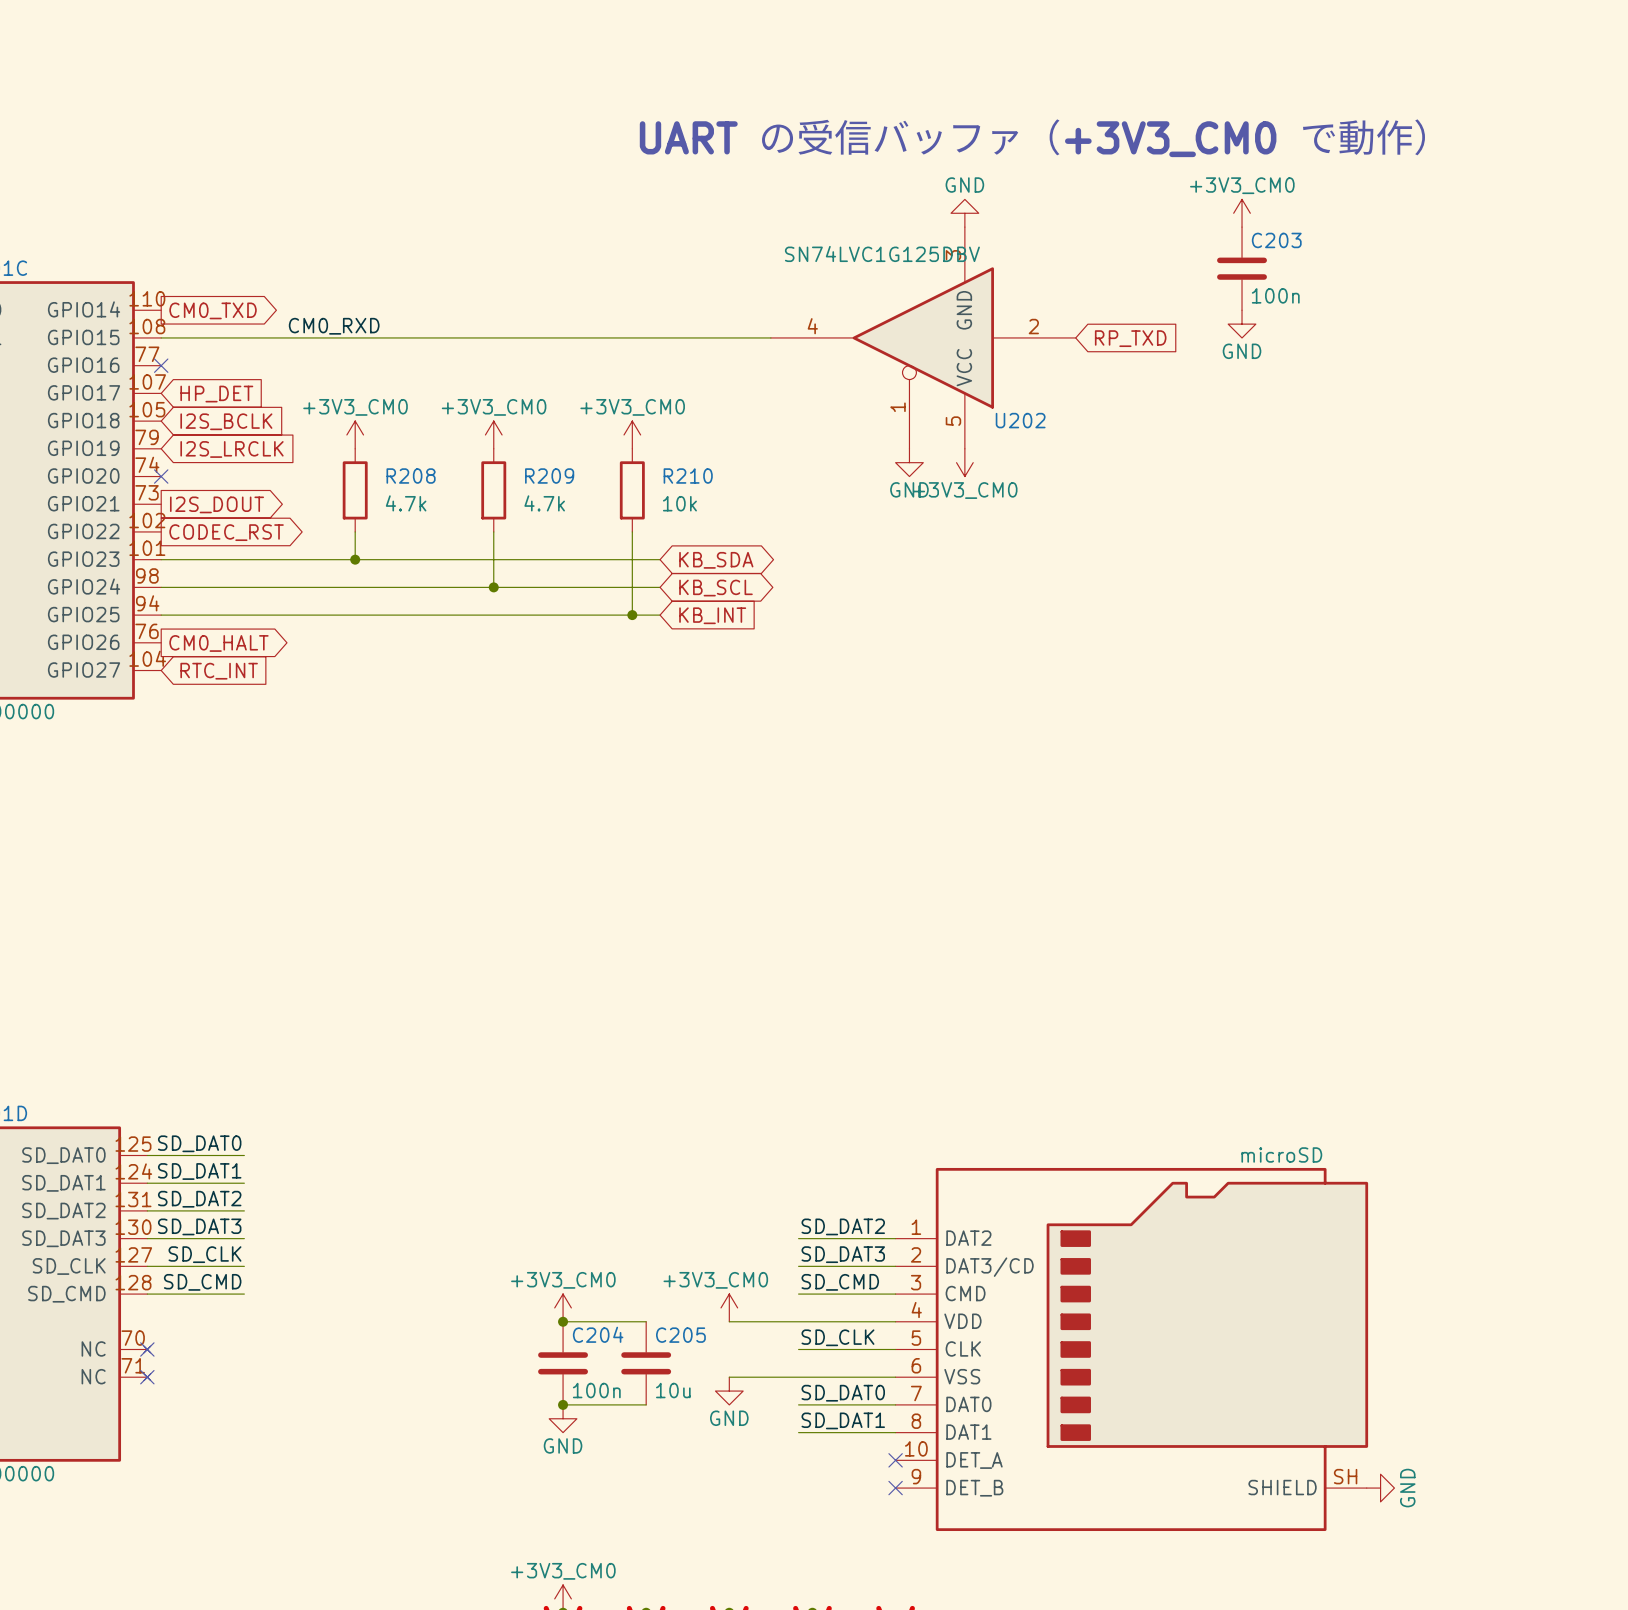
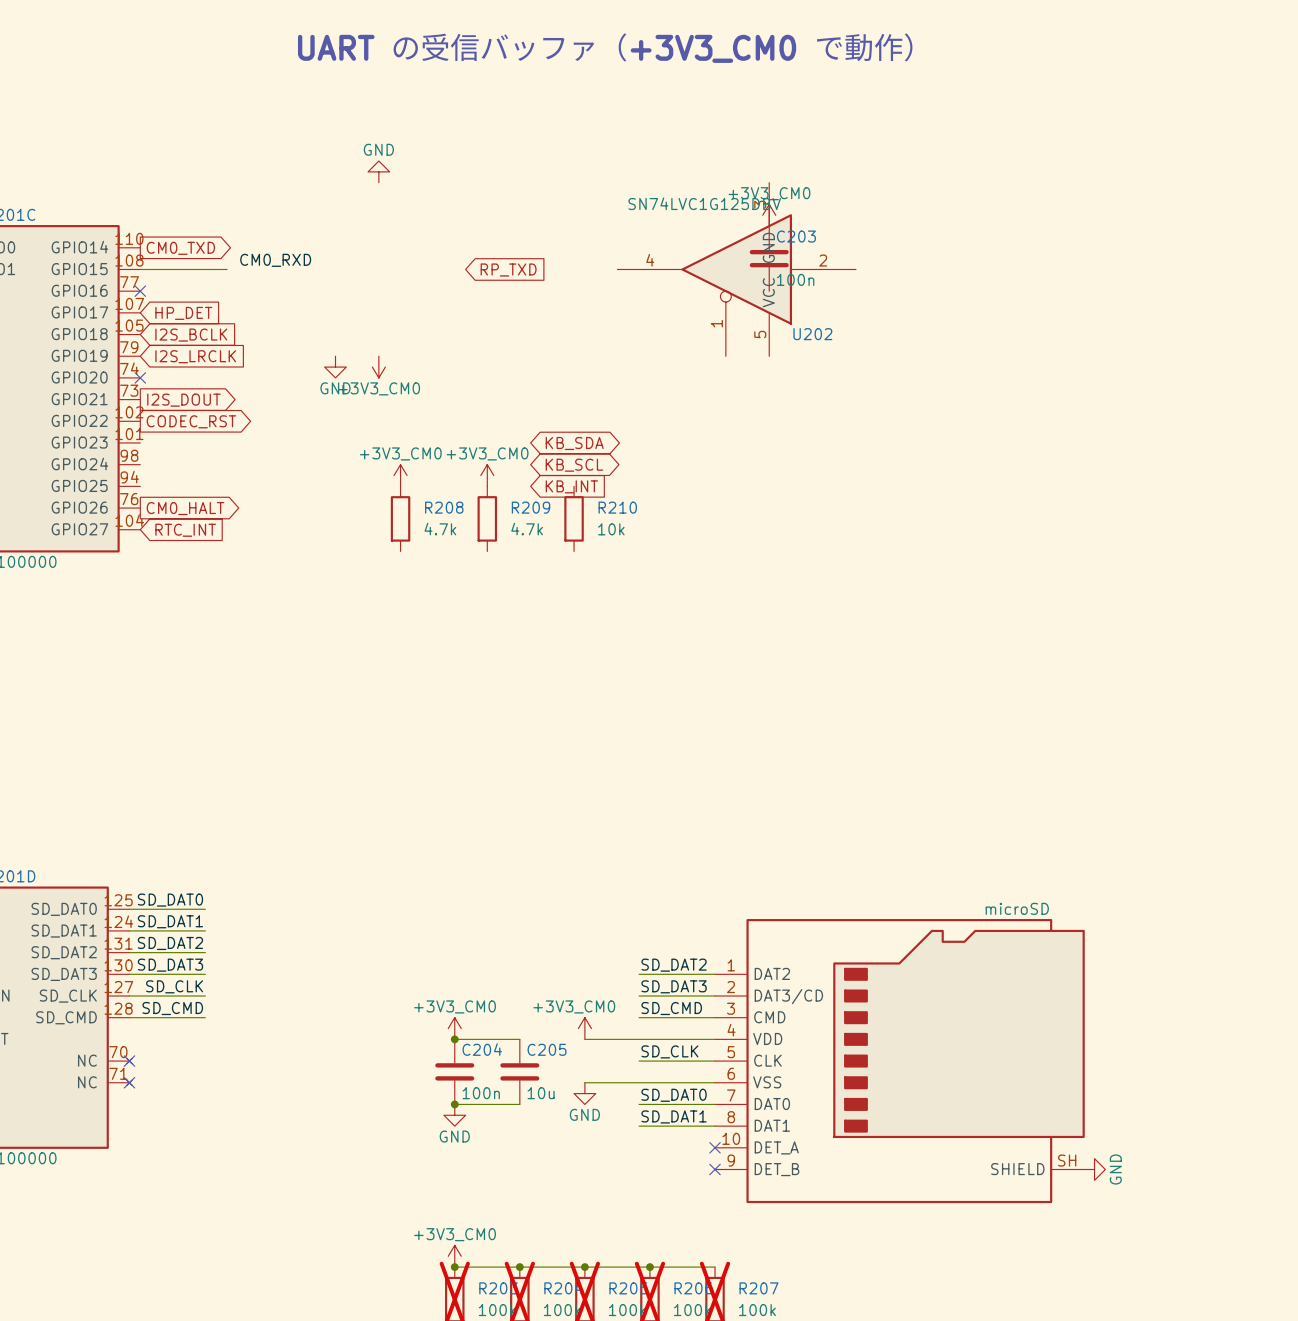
text: none -> UART の受信バッファ（+3V3_CM0 で動作） (606, 47)
text: UART の受信バッファ（+3V3_CM0 で動作） (1033, 137) -> none
power symbol: none -> GND (378, 171)
power symbol: GND (964, 213) -> none
power symbol: +3V3_CM0 (1242, 213) -> none
power symbol: none -> +3V3_CM0 (769, 215)
C203 position: (1242, 268) -> (769, 258)
power symbol: GND (1242, 324) -> none
wire: (272, 337) (770, 337) -> none
global label: none -> RP_TXD (508, 270)
global label: RP_TXD (1130, 338) -> none
power symbol: +3V3_CM0 (355, 434) -> none
power symbol rotation: 0° (493, 434) -> 180° (378, 367)
power symbol position: +3V3_CM0 (493, 434) -> +3V3_CM0 (378, 367)
power symbol: +3V3_CM0 (632, 434) -> none
power symbol: none -> GND (335, 367)
power symbol: GND (909, 462) -> none
power symbol: +3V3_CM0 (964, 462) -> none
R208 position: (355, 490) -> (400, 518)
R209 position: (493, 490) -> (487, 518)
R210 position: (632, 490) -> (574, 518)
wire: (355, 531) (355, 559) -> none
wire: (493, 531) (493, 587) -> none
wire: (632, 531) (632, 615) -> none
wire: (161, 559) (660, 559) -> none
junction: (355, 559) -> none
wire: (161, 587) (660, 587) -> none
junction: (493, 587) -> none
power symbol: none -> +3V3_CM0 (400, 475)
power symbol: none -> +3V3_CM0 (487, 475)
wire: (161, 615) (660, 615) -> none
junction: (632, 615) -> none

